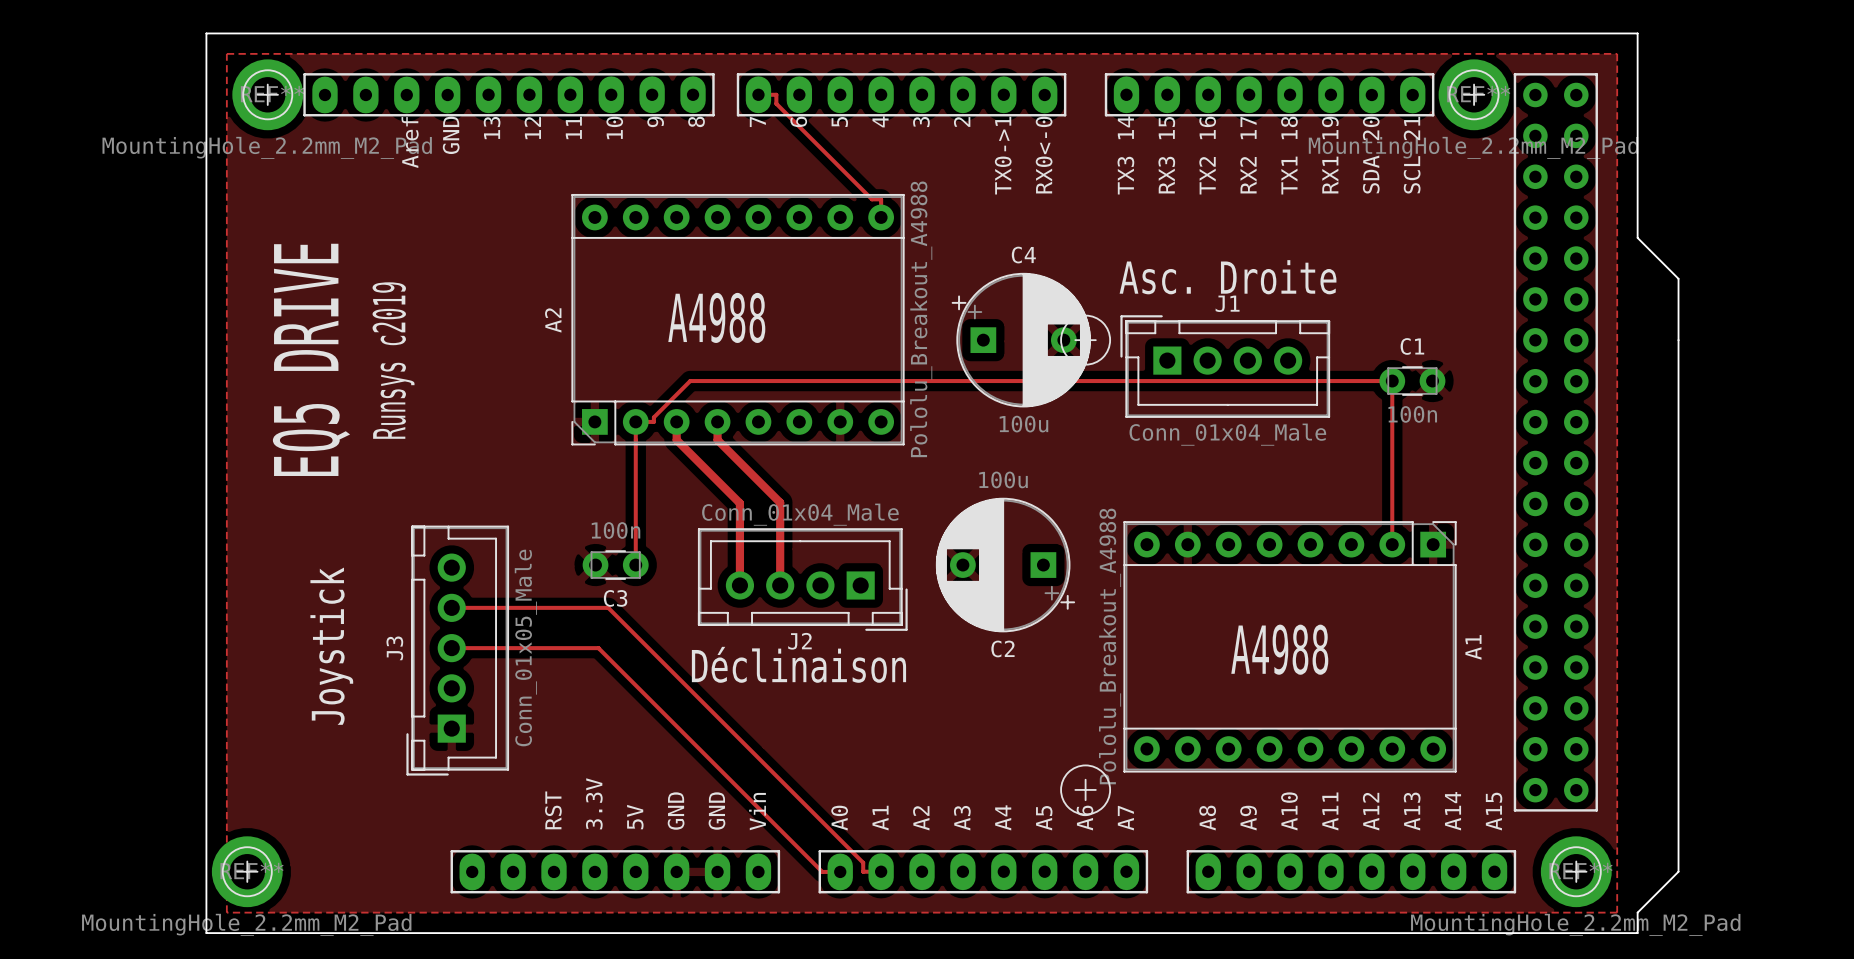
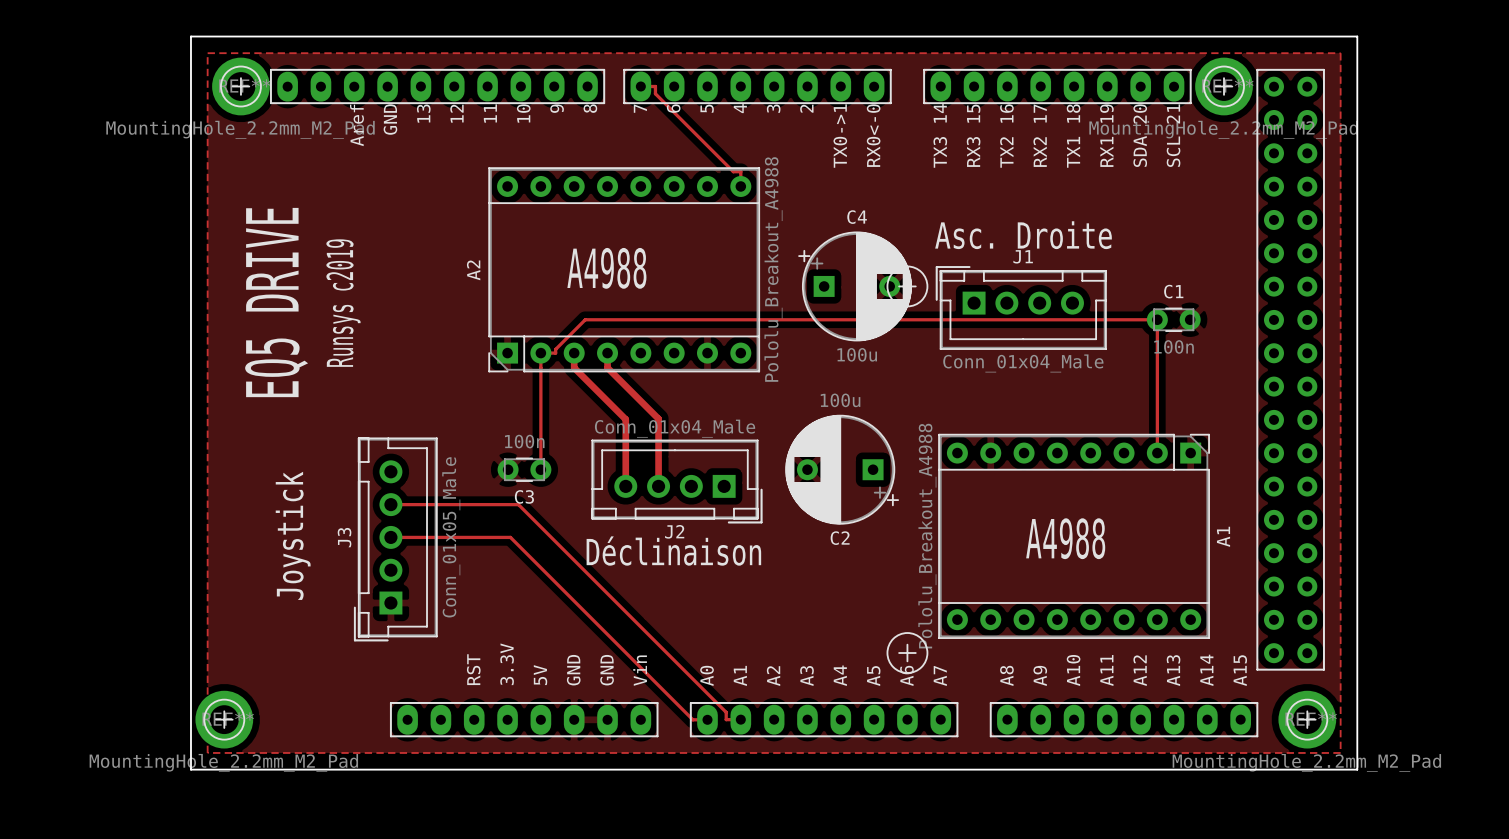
board edge: (1637, 237) (1678, 278) (1678, 871) (1637, 912) -> (1357, 203) (1357, 752)

